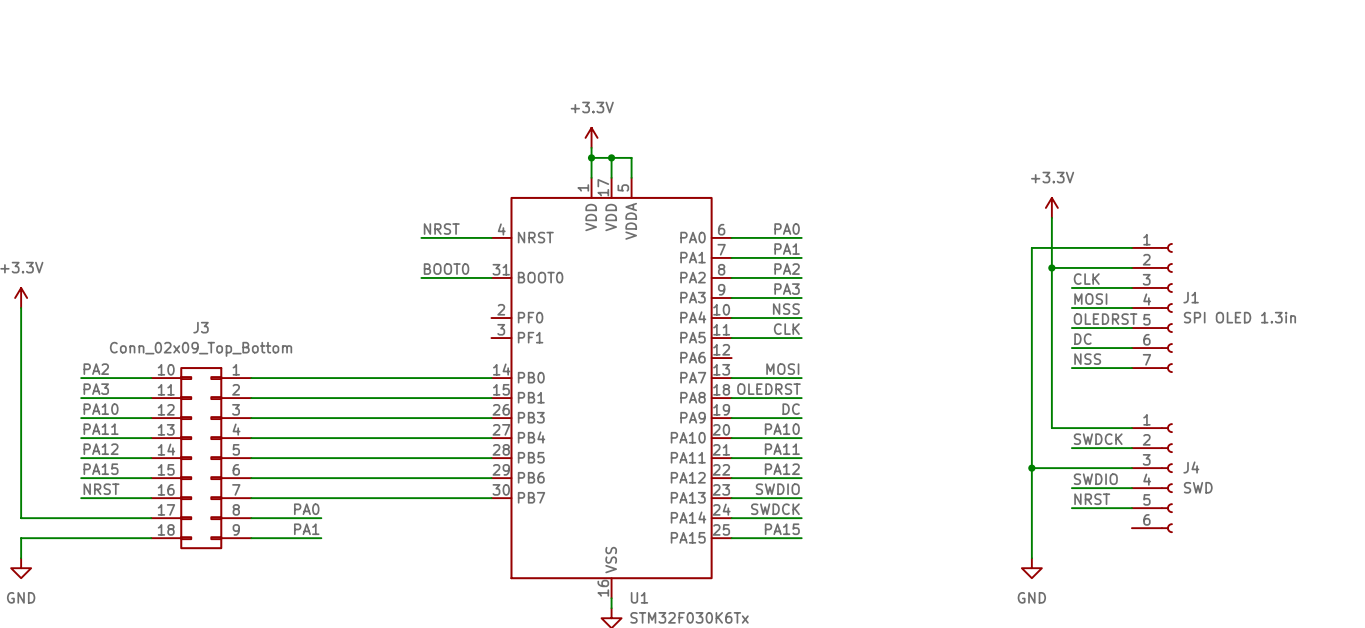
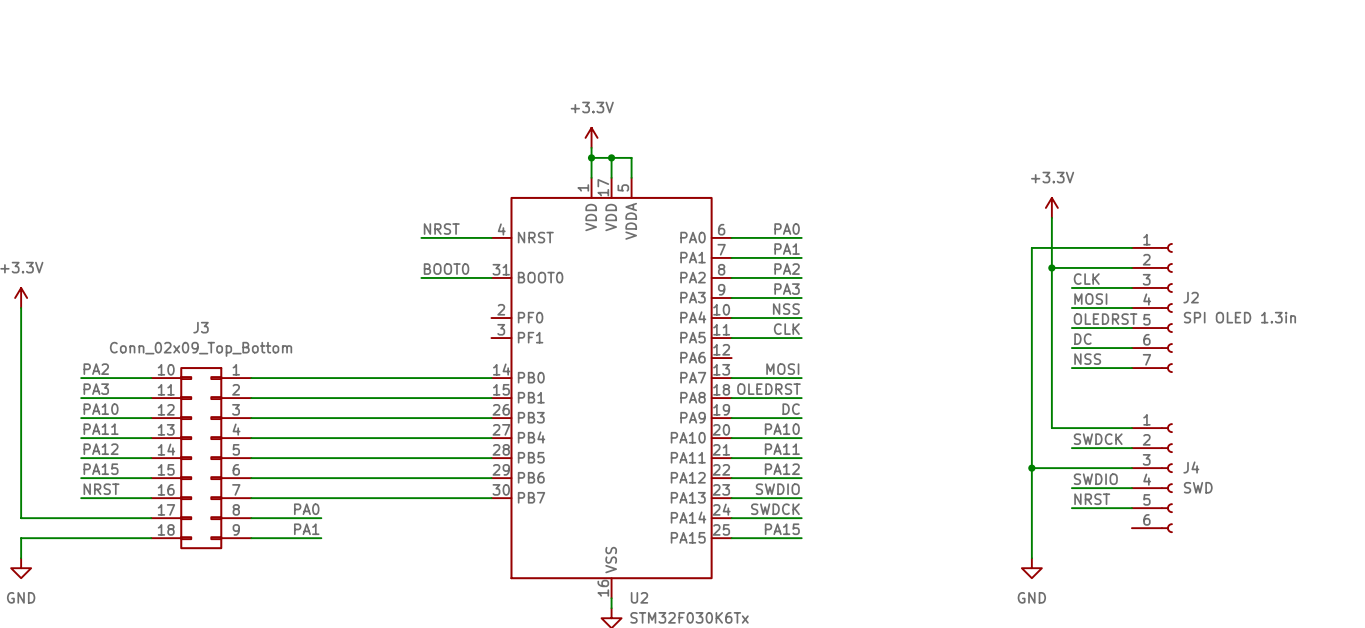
J1 name: J1 (1191, 297) -> J2 (1191, 297)
U1 name: U1 (639, 597) -> U2 (639, 597)

